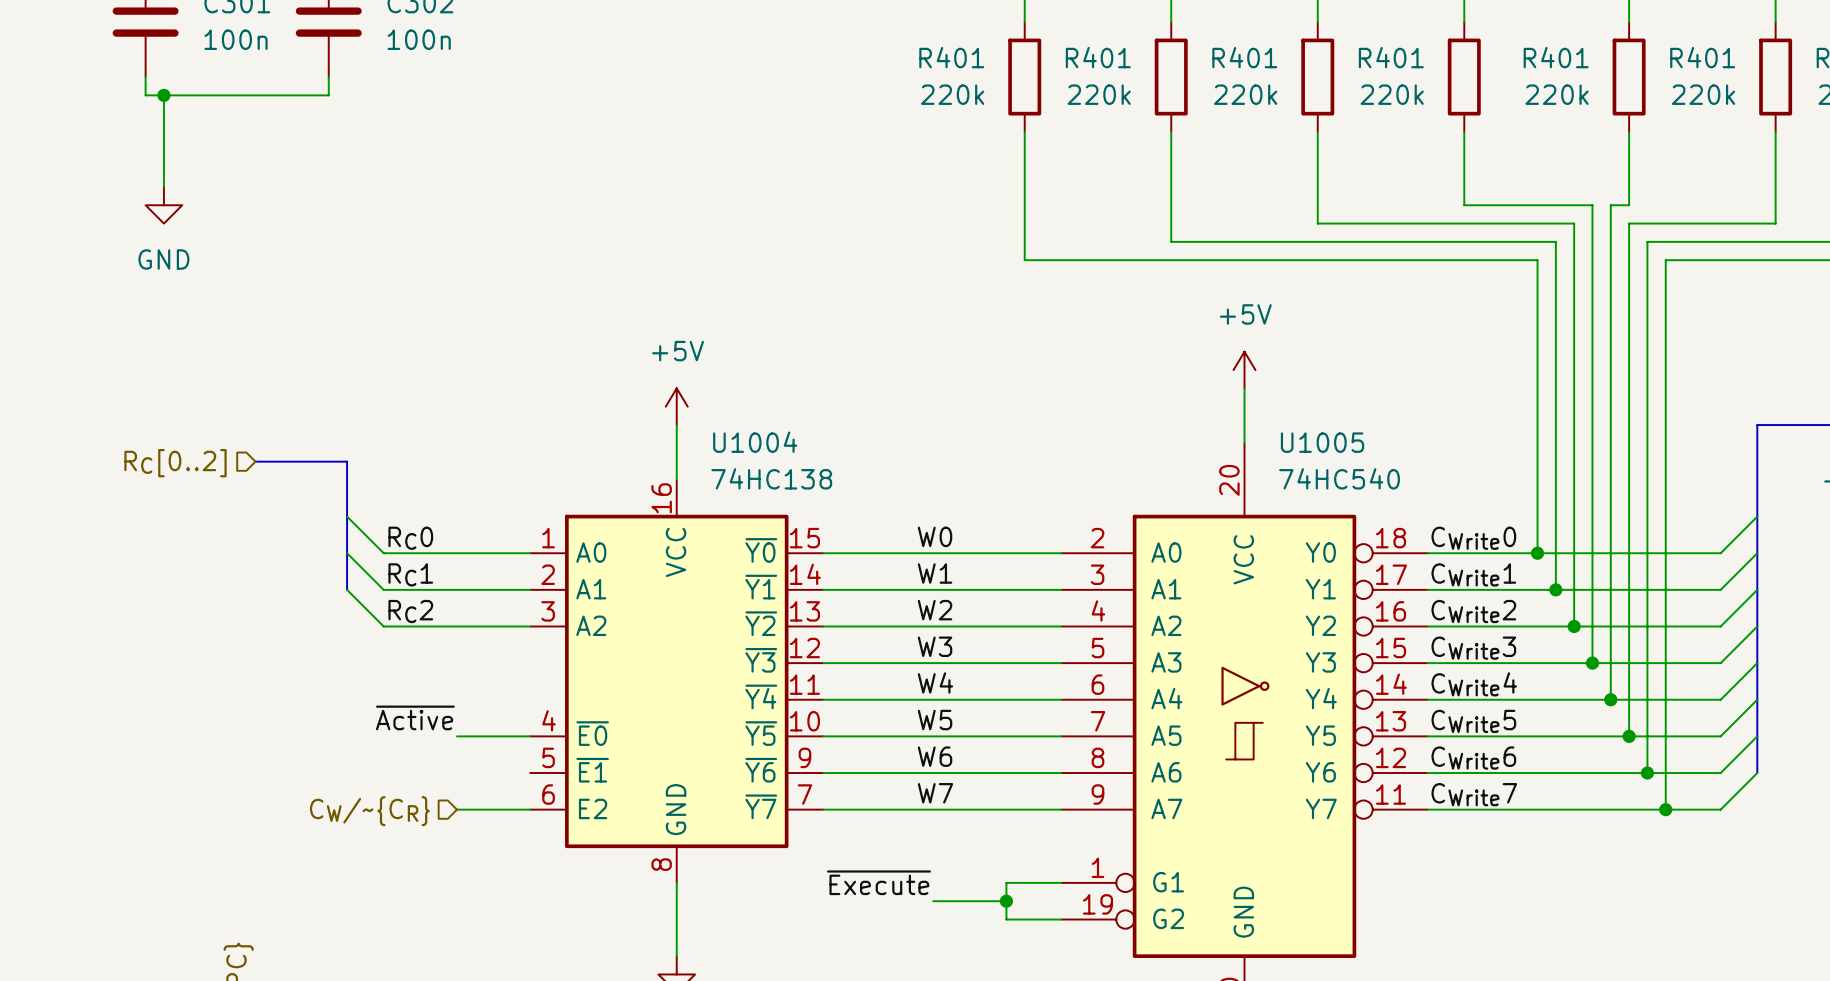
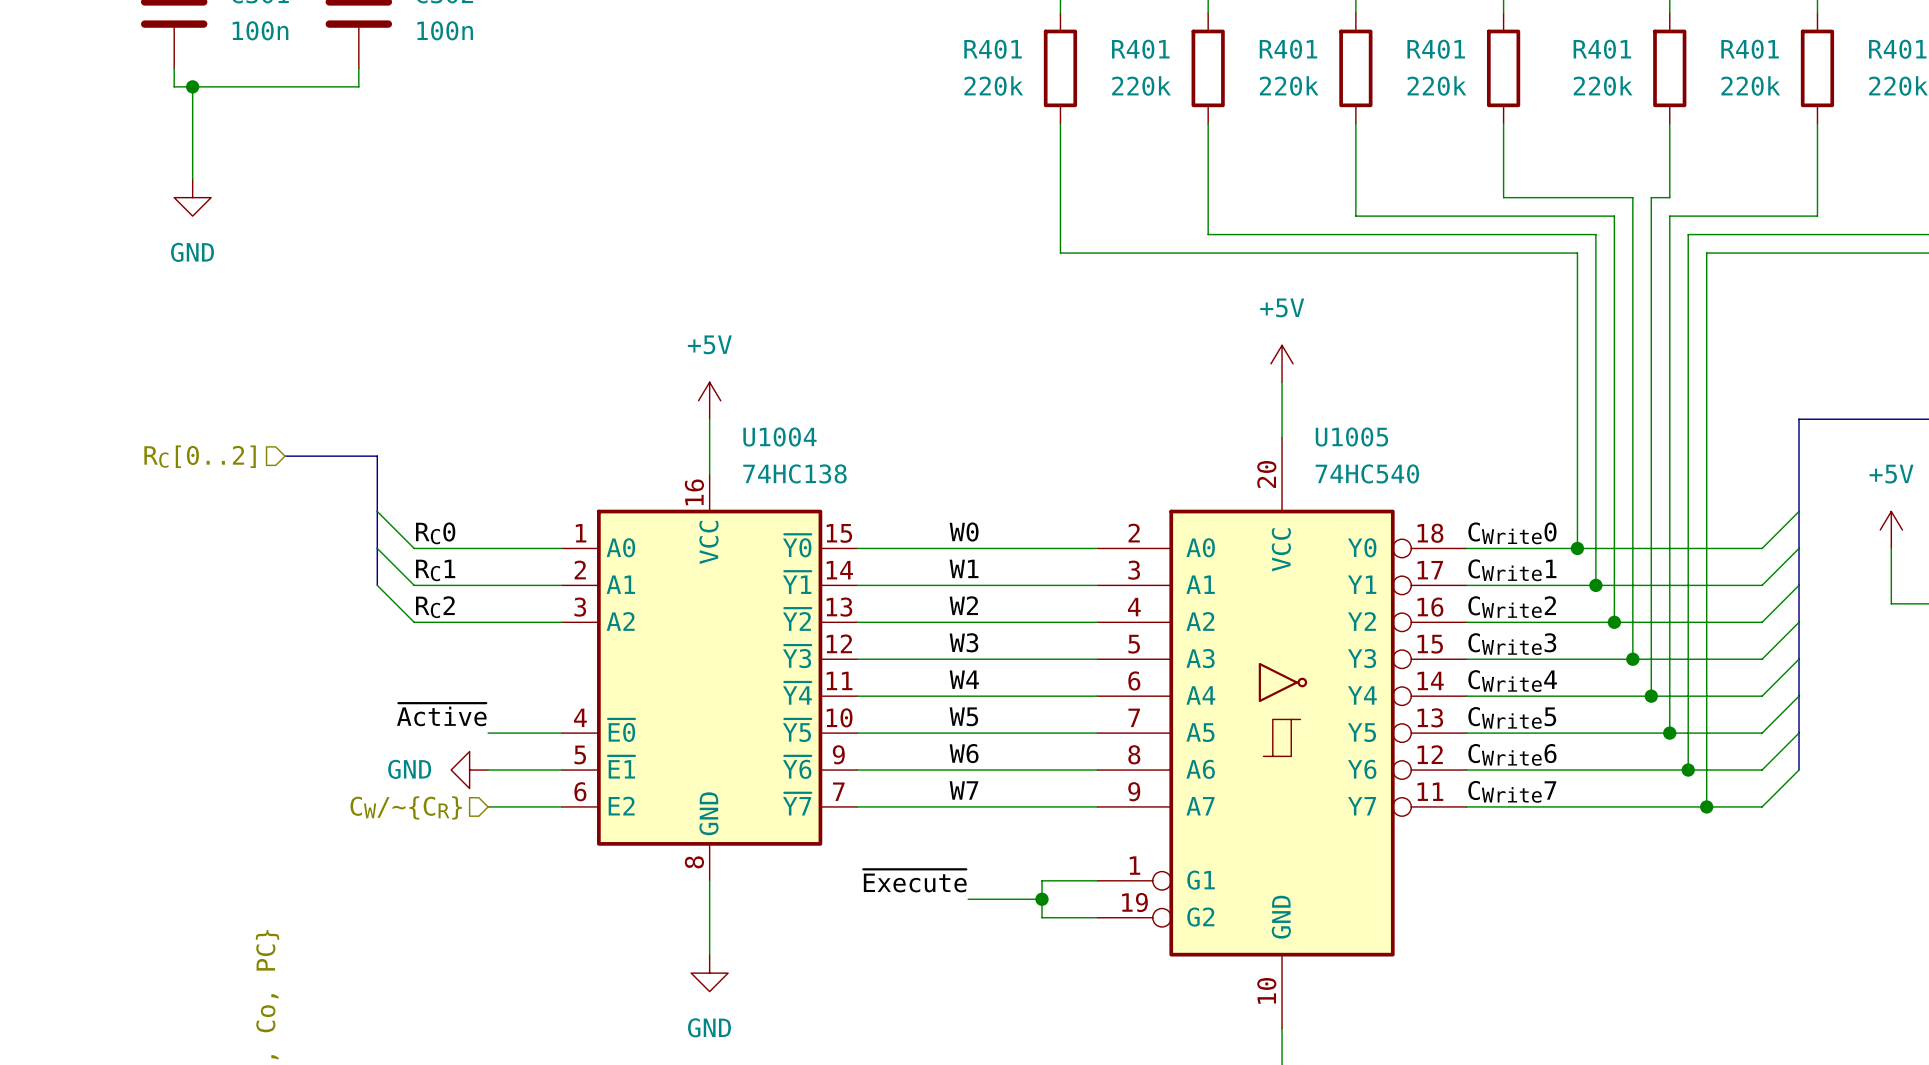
power symbol: none -> GND (469, 770)
wire: none -> (488, 770) (561, 770)

